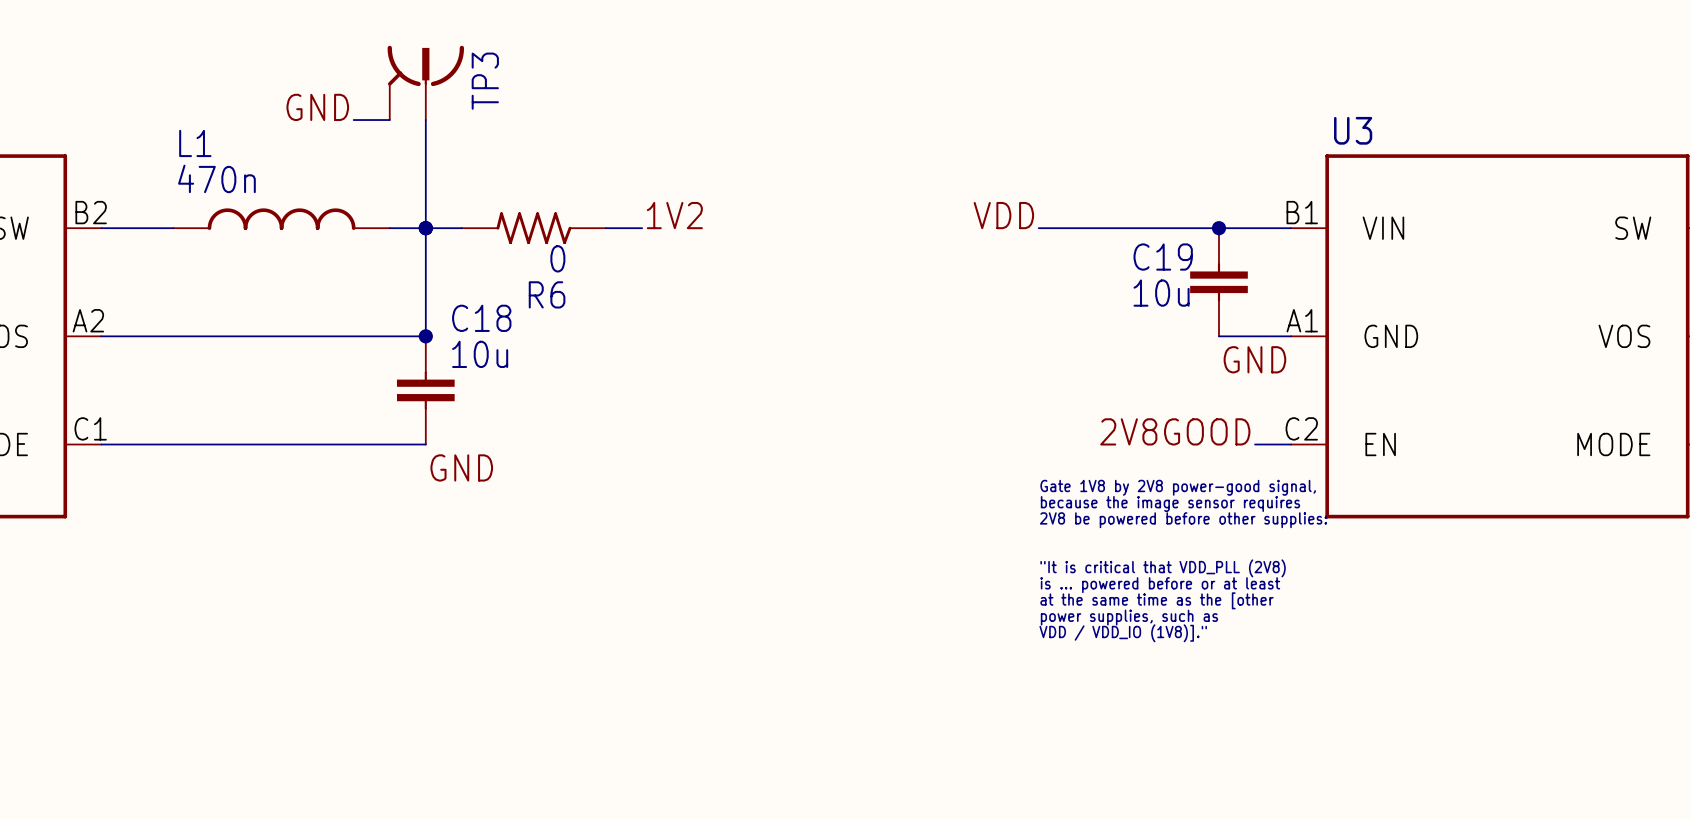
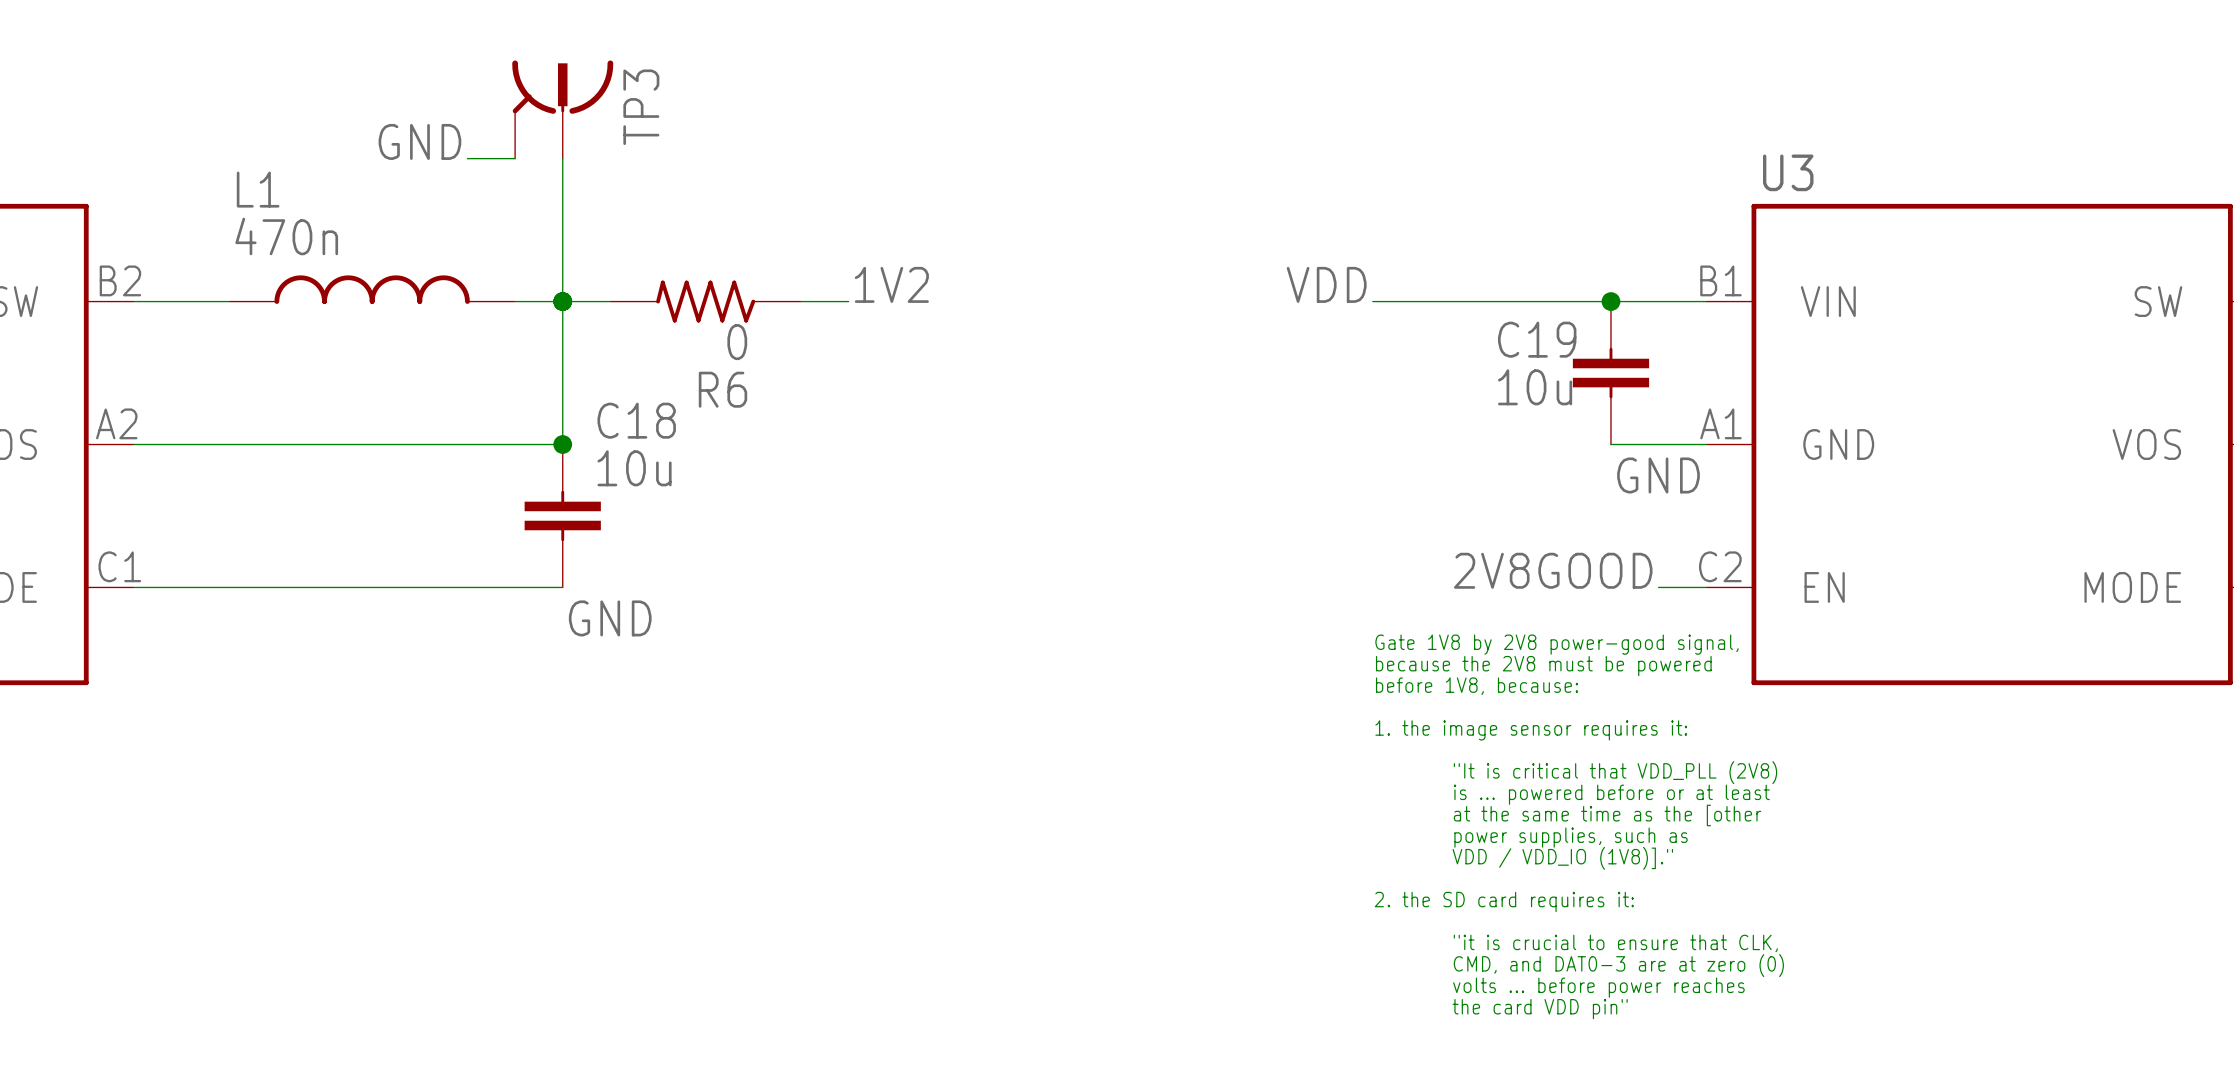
text: because the image sensor requires (1170, 503) -> because the 2V8 must be powered (1543, 666)
text: 2V8 be powered before other supplies: (1183, 520) -> before 1V8, because: (1477, 686)
text: none -> 1. the image sensor requires it: (1531, 730)
text: "It is critical that VDD_PLL (2V8) (1163, 568) -> none
text: is ... powered before or at least (1160, 585) -> "It is critical that VDD_PLL (2V8) (1615, 772)
text: at the same time as the [other (1157, 600) -> is ... powered before or at least (1611, 794)
text: power supplies, such as (1129, 617) -> at the same time as the [other (1607, 815)
text: VDD / VDD_IO (1V8)]." (1123, 633) -> power supplies, such as (1571, 837)
text: none -> VDD / VDD_IO (1V8)]." (1562, 858)
text: none -> 2. the SD card requires it: (1504, 901)
text: none -> "it is crucial to ensure that CLK, (1615, 943)
text: none -> CMD, and DAT0-3 are at zero (0) (1618, 965)
text: none -> volts ... before power reaches (1598, 987)
text: none -> the card VDD pin" (1540, 1009)

